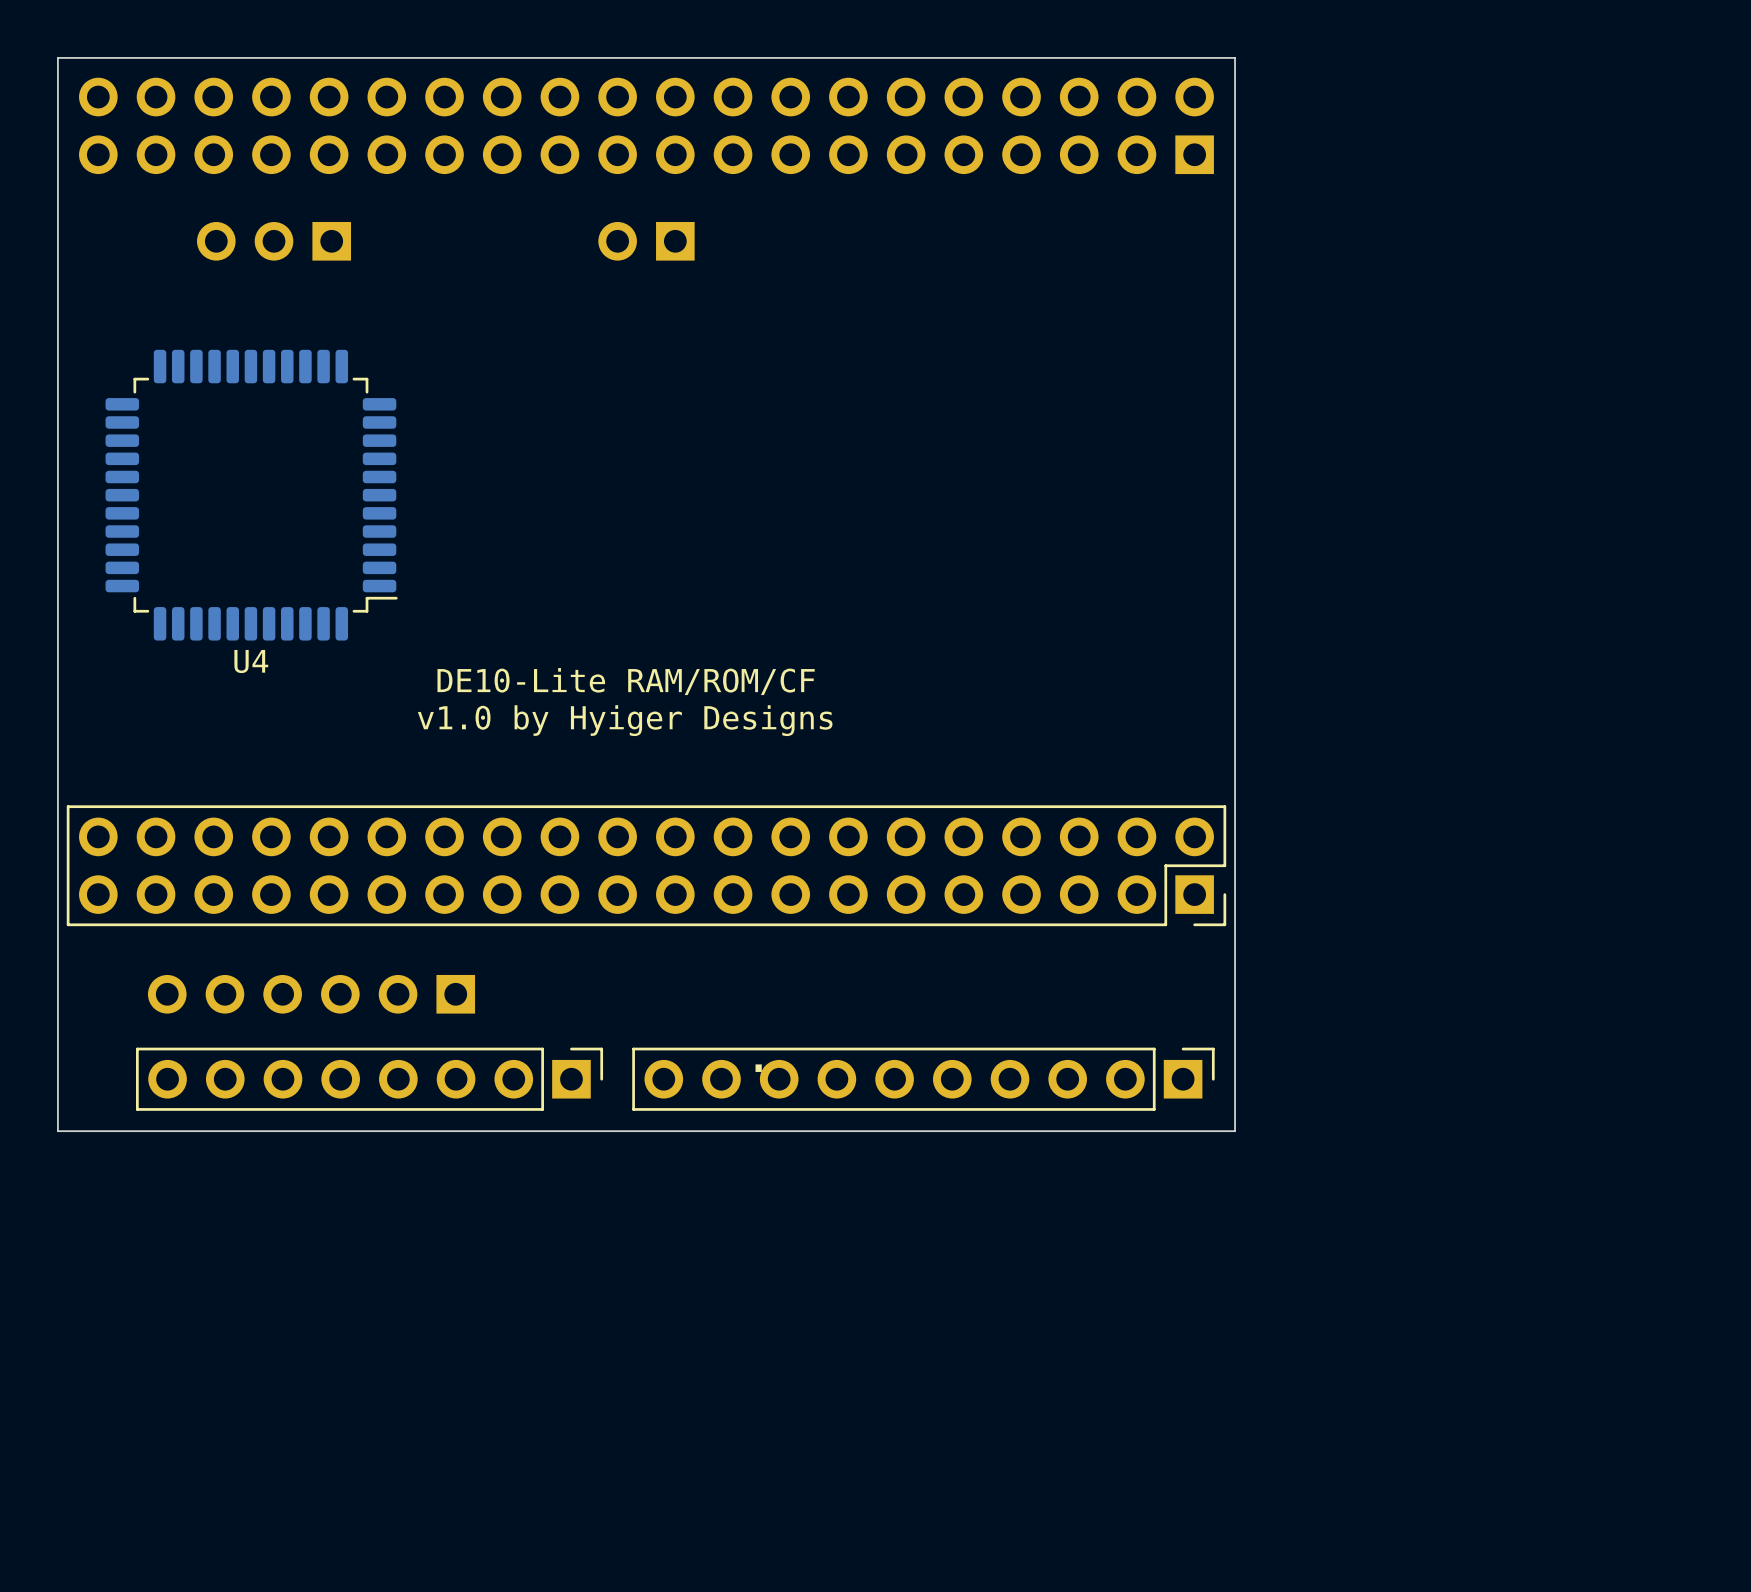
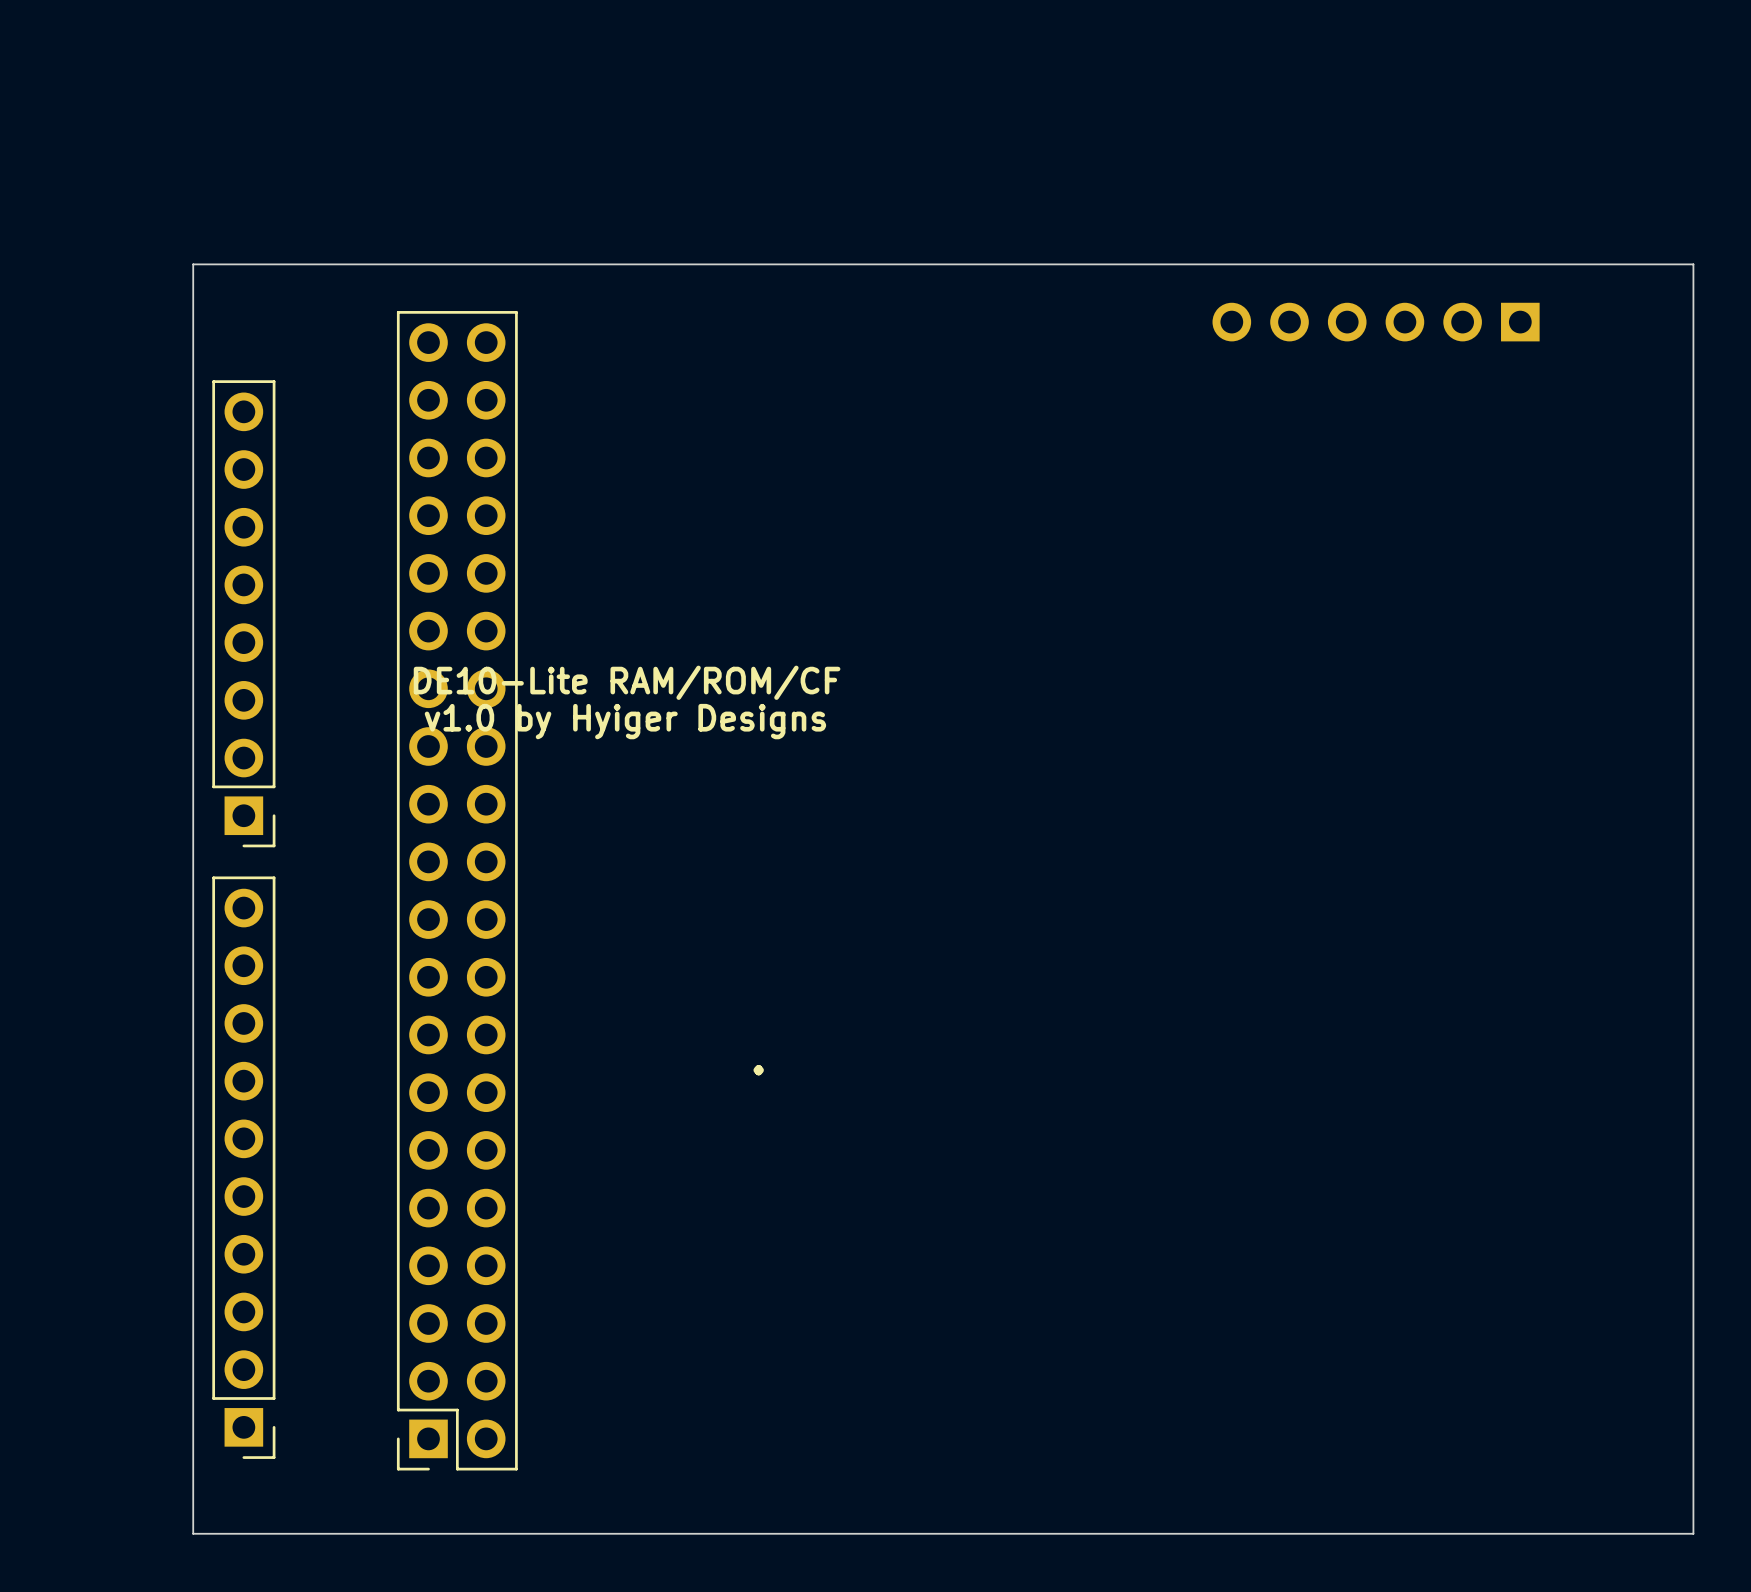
board edge: (1235, 57) (57, 57) (57, 1131) (1235, 1131) (1235, 57) -> none
part: (646, 125) -> none
part: (274, 241) -> none
part: (646, 241) -> none
board edge: none -> (1693, 264) (193, 264) (193, 1533) (1693, 1533) (1693, 264)
part: none -> (1376, 322)
U4: (251, 495) -> none
part rotation: 0° (646, 865) -> 90° clockwise (457, 890)
part: (311, 994) -> none
part rotation: 0° (369, 1079) -> 90° clockwise (243, 613)
part position: (369, 1079) -> (243, 613)
part: (923, 1079) -> none
part: none -> (243, 1167)

